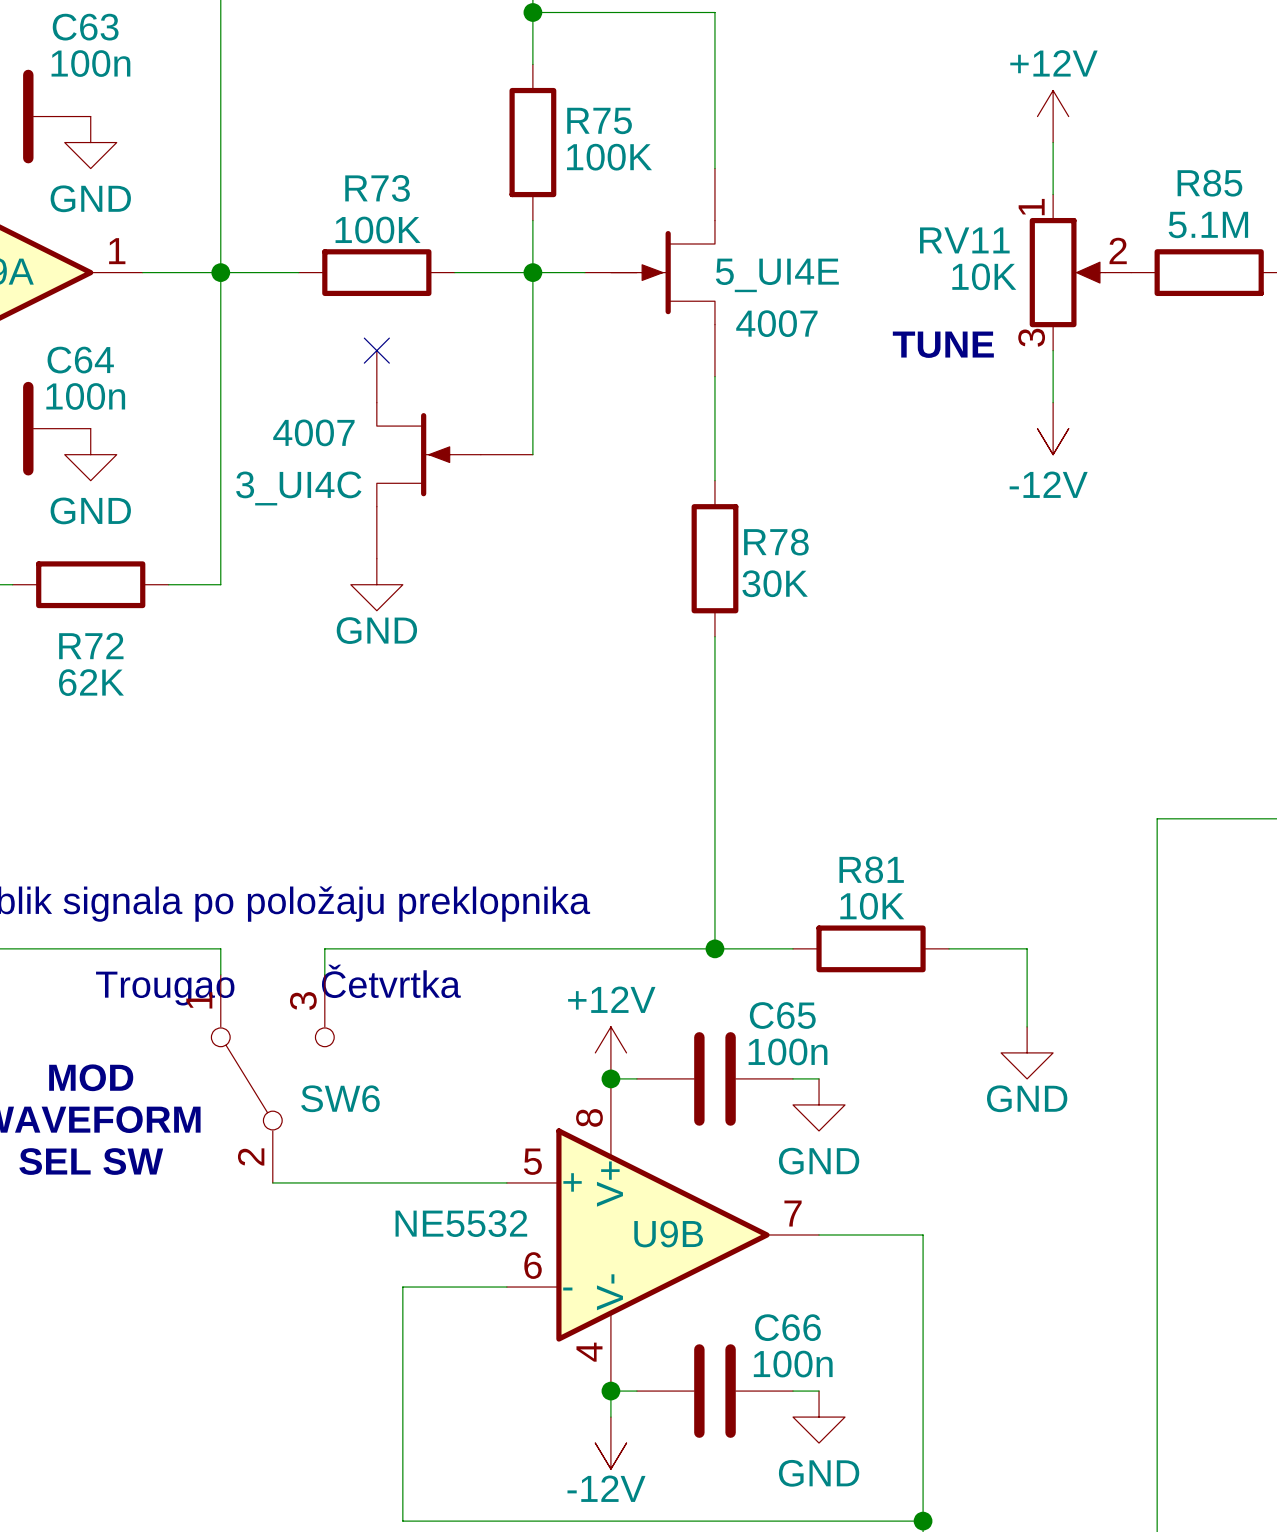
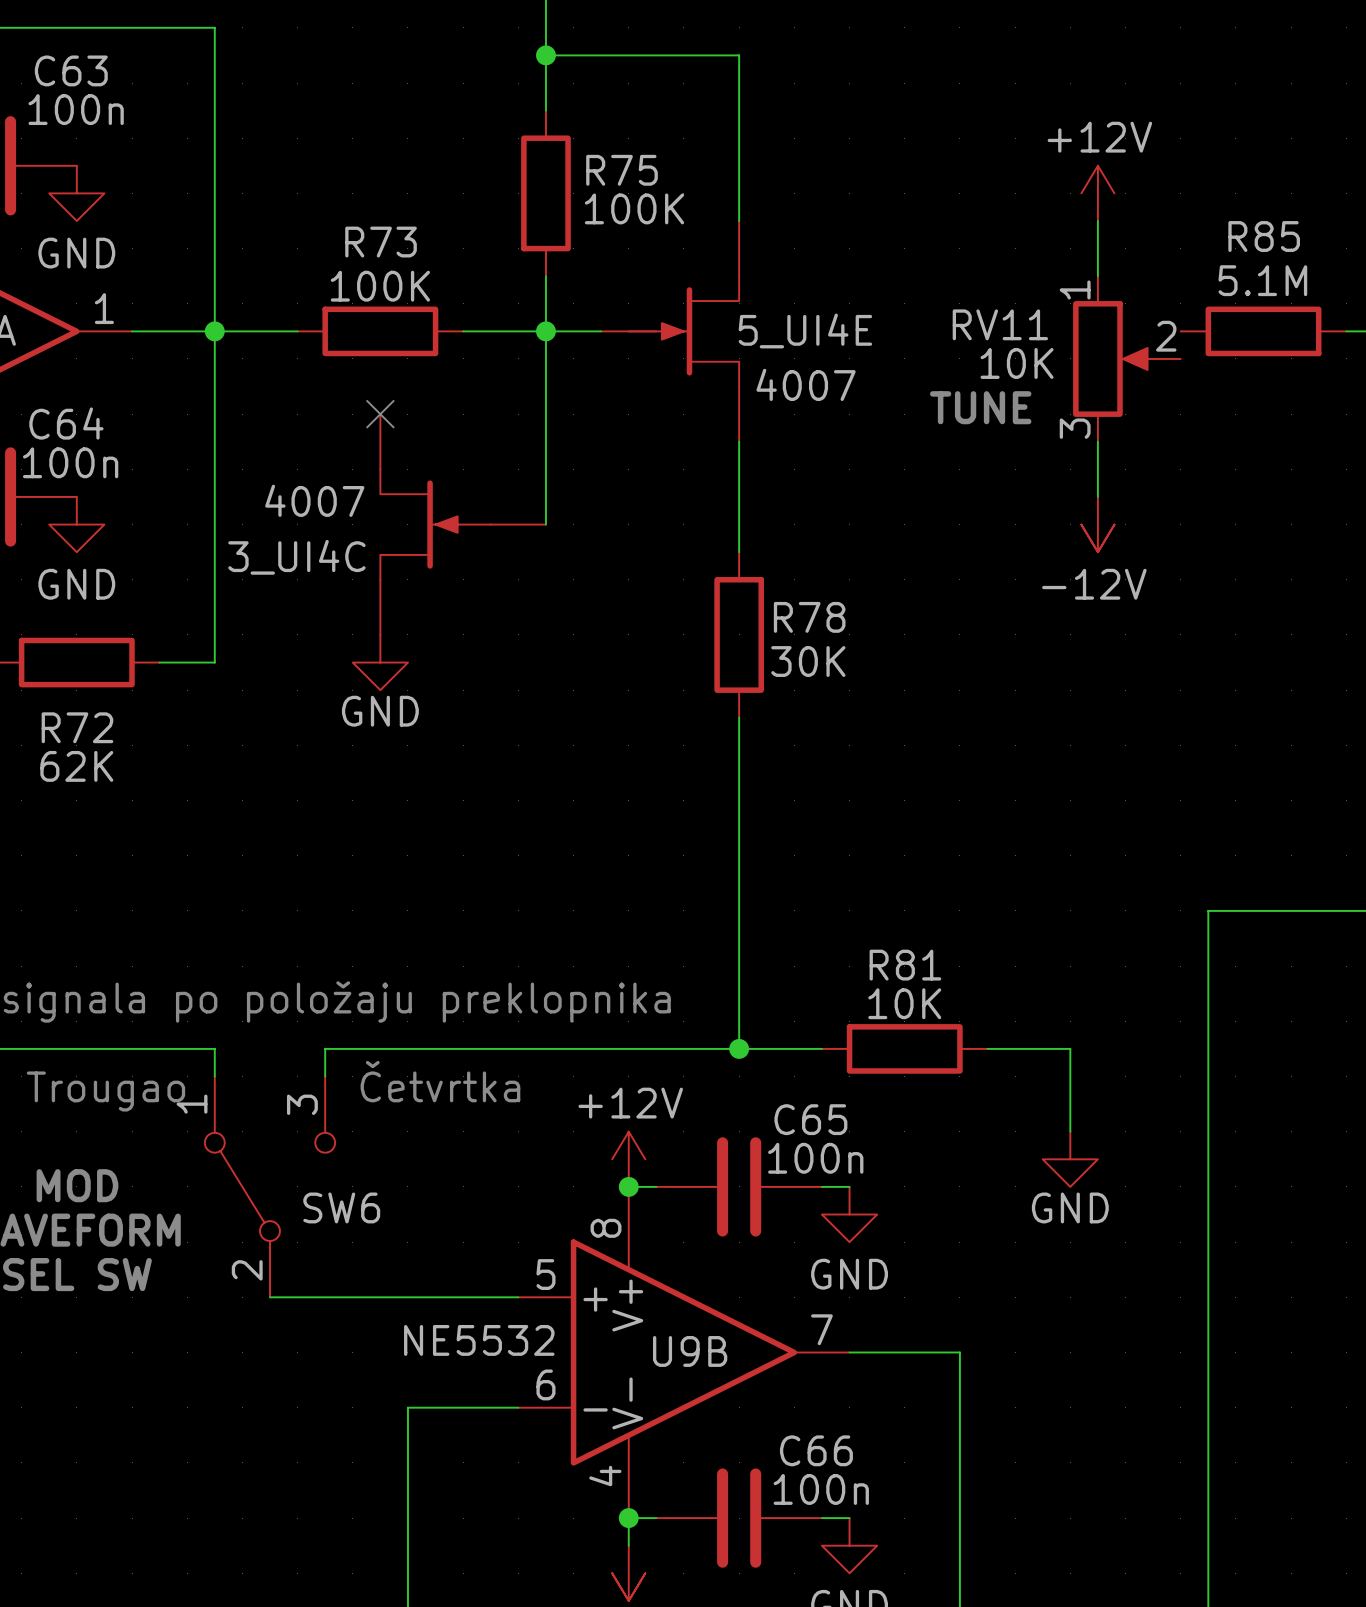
power symbol position: +12V (1053, 116) -> +12V (1097, 193)
RV11 position: (1080, 272) -> (1126, 358)
power symbol position: -12V (1053, 428) -> -12V (1097, 524)

